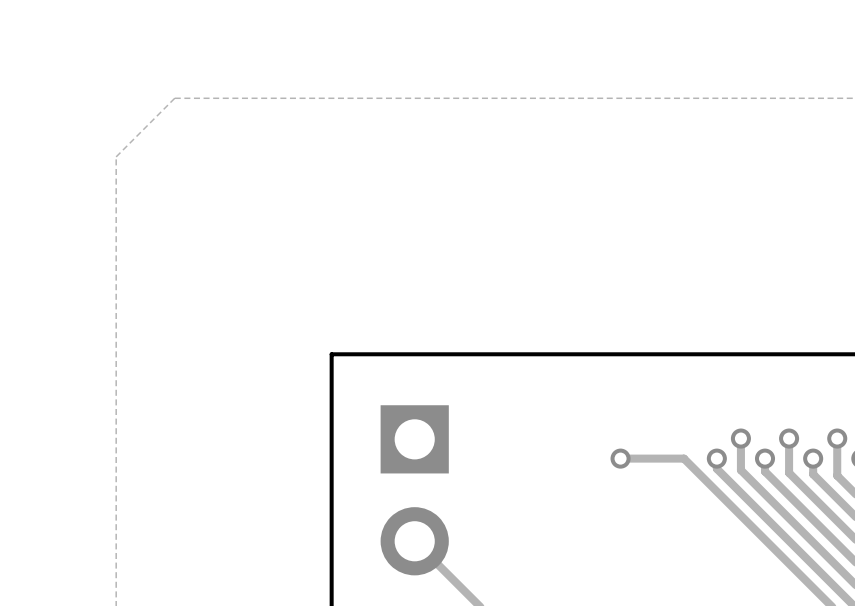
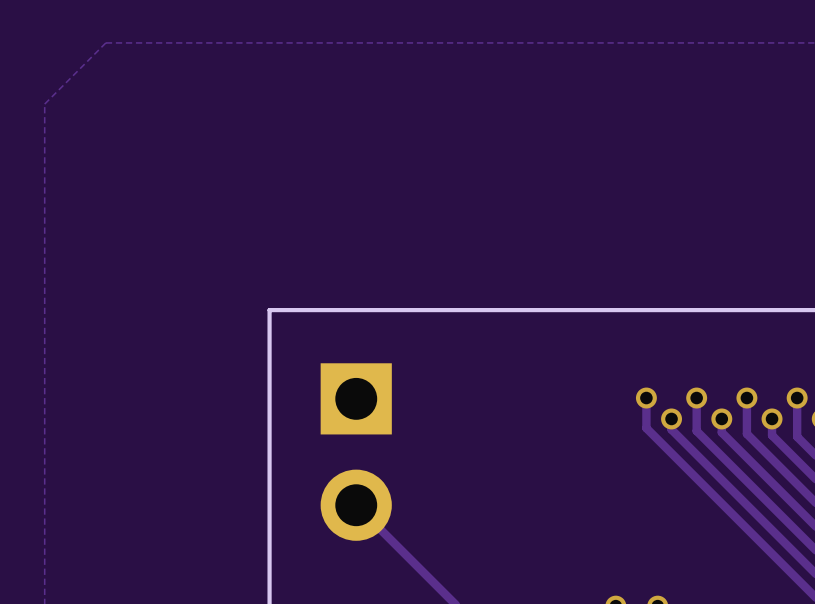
track: (620, 458) (683, 458) (692, 467) -> (646, 398) (646, 428)
via position: (620, 458) -> (646, 398)

